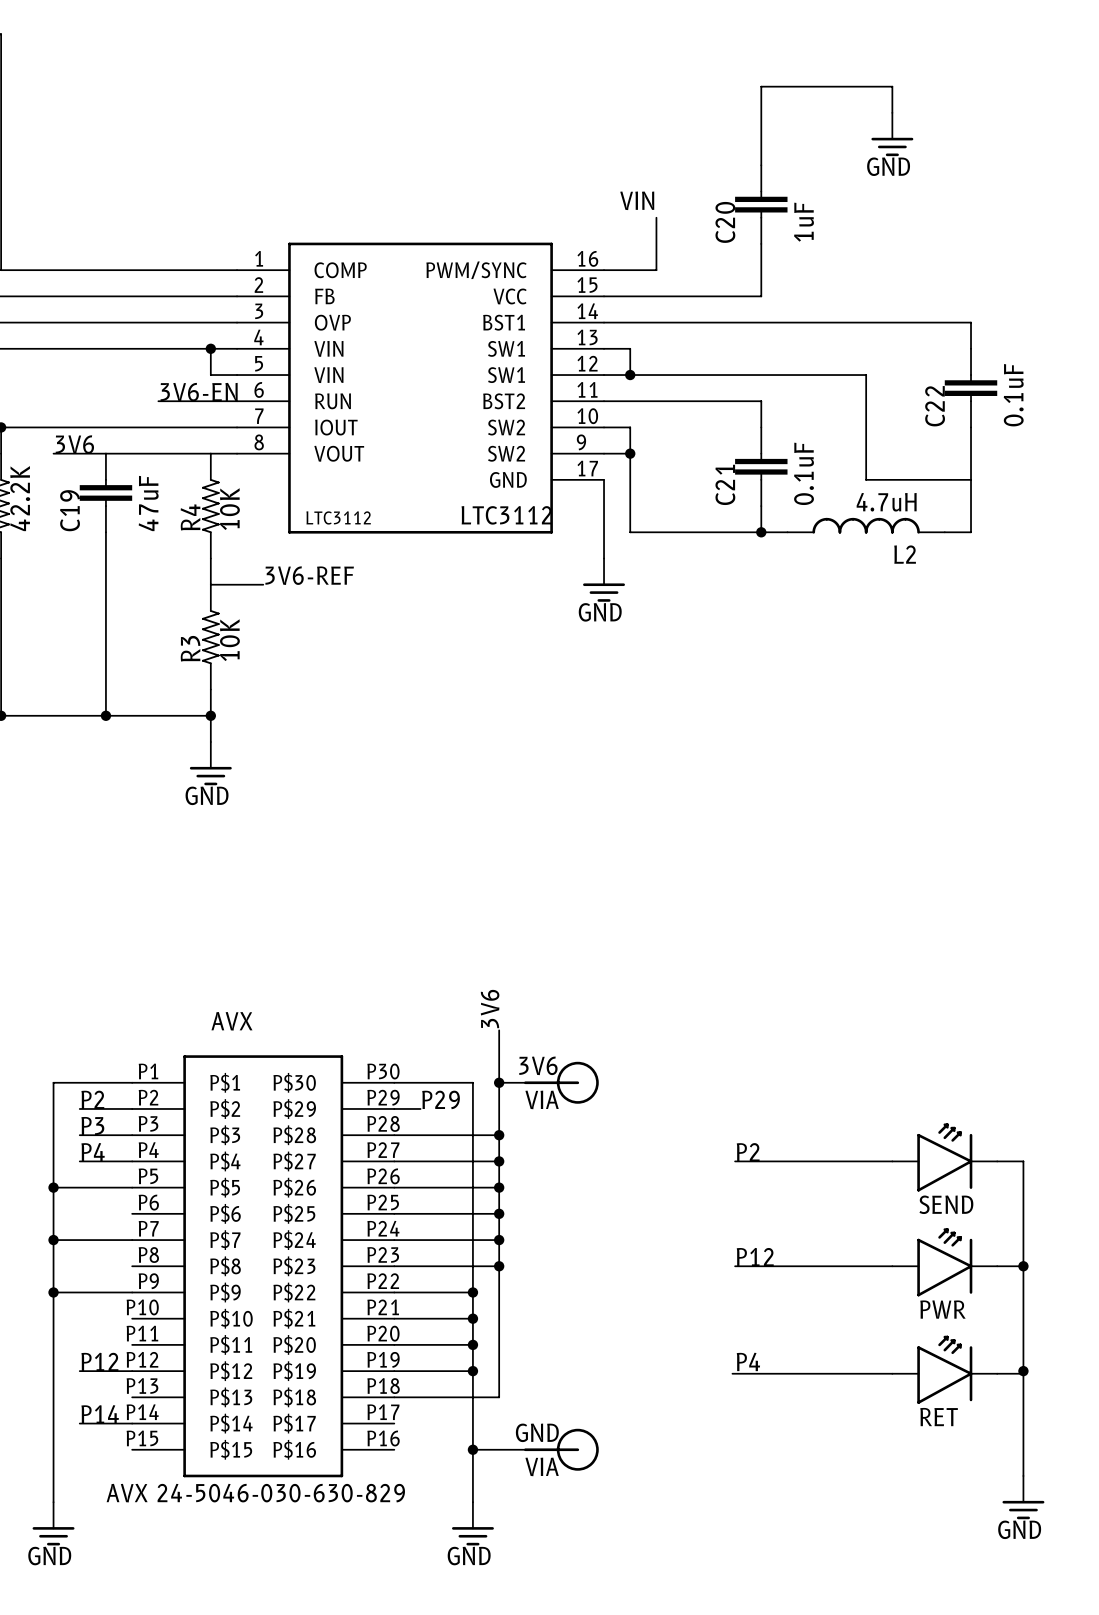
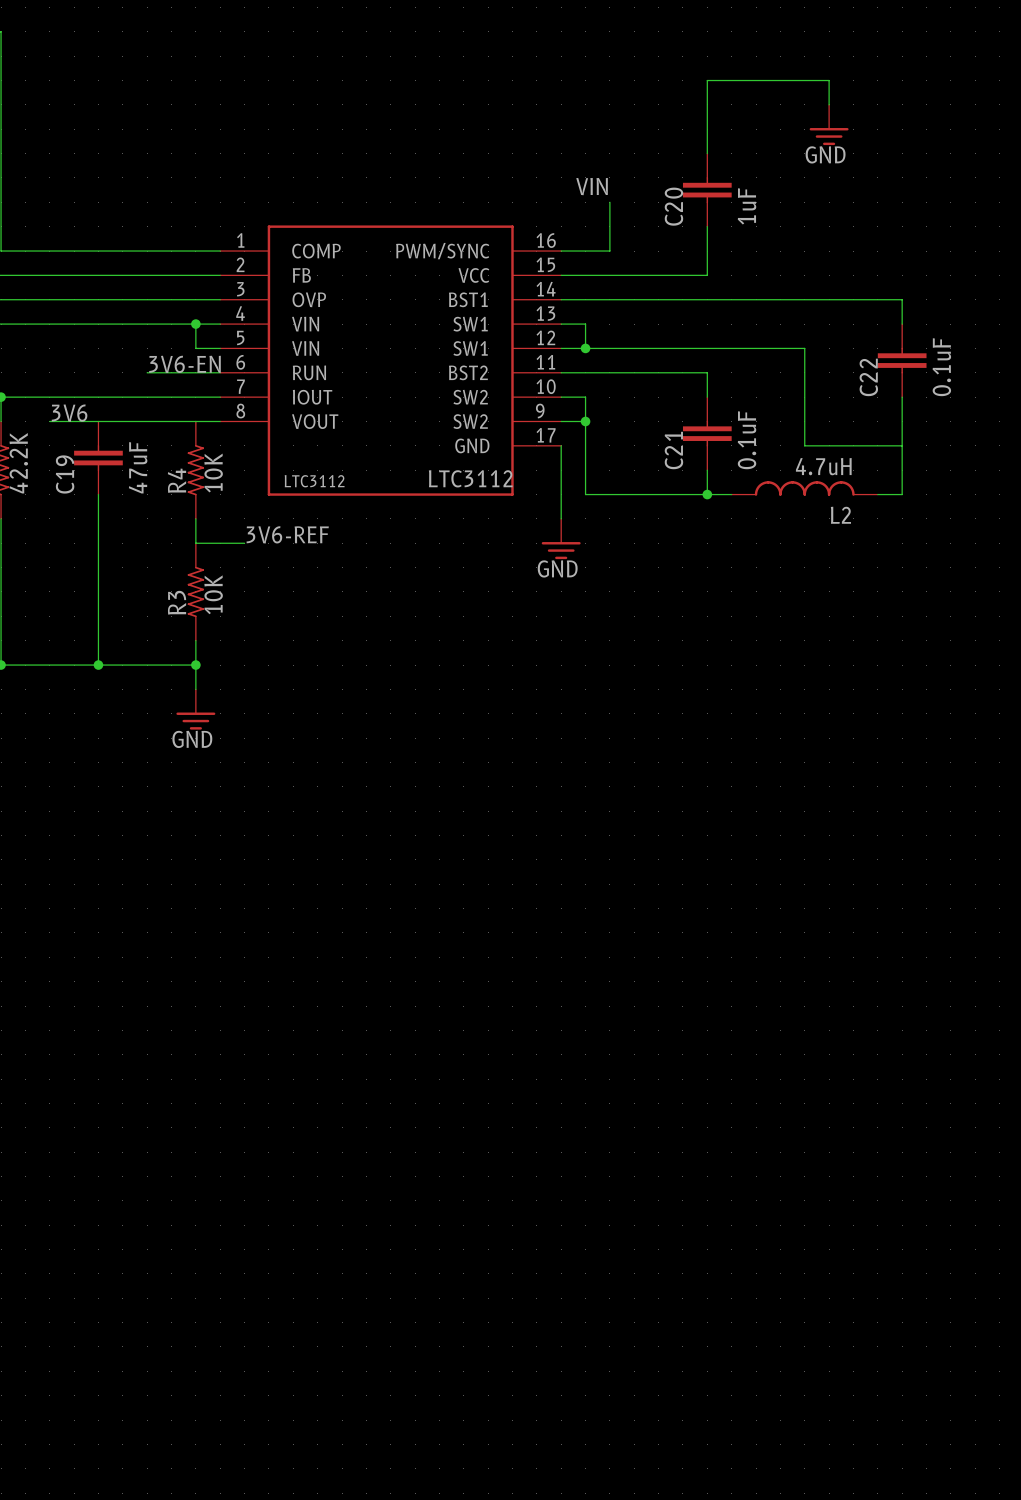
label: 3V6 (490, 1009) -> none
wire: (499, 1030) (499, 1397) (394, 1397) -> none
wire: (132, 1082) (53, 1082) (53, 1502) -> none
wire: (394, 1082) (472, 1082) (472, 1502) -> none
wire: (499, 1082) (525, 1082) -> none
junction: (499, 1082) -> none
part: 3V6 (561, 1082) -> none
label: P2 (92, 1099) -> none
label: P29 (441, 1099) -> none
wire: (79, 1108) (132, 1108) -> none
wire: (394, 1108) (420, 1108) -> none
label: P3 (92, 1126) -> none
wire: (79, 1135) (132, 1135) -> none
wire: (394, 1135) (499, 1135) -> none
junction: (499, 1135) -> none
label: P4 (93, 1152) -> none
label: P2 (748, 1152) -> none
SEND: (944, 1157) -> none
wire: (79, 1161) (132, 1161) -> none
wire: (394, 1161) (499, 1161) -> none
junction: (499, 1161) -> none
wire: (735, 1161) (892, 1161) -> none
wire: (997, 1161) (1023, 1161) (1023, 1475) -> none
wire: (53, 1187) (132, 1187) -> none
junction: (53, 1187) -> none
wire: (394, 1187) (499, 1187) -> none
junction: (499, 1187) -> none
wire: (394, 1213) (499, 1213) -> none
junction: (499, 1213) -> none
wire: (53, 1240) (132, 1240) -> none
junction: (53, 1240) -> none
wire: (394, 1240) (499, 1240) -> none
junction: (499, 1240) -> none
label: P12 (755, 1257) -> none
PWR: (944, 1262) -> none
AVX: (263, 1266) -> none
wire: (394, 1266) (499, 1266) -> none
junction: (499, 1266) -> none
wire: (735, 1266) (892, 1266) -> none
wire: (997, 1266) (1023, 1266) -> none
junction: (1023, 1266) -> none
wire: (53, 1292) (132, 1292) -> none
junction: (53, 1292) -> none
wire: (394, 1292) (472, 1292) -> none
junction: (472, 1292) -> none
wire: (394, 1318) (472, 1318) -> none
junction: (472, 1318) -> none
wire: (394, 1344) (472, 1344) -> none
junction: (472, 1344) -> none
label: P12 (99, 1361) -> none
label: P4 (748, 1361) -> none
RET: (944, 1369) -> none
wire: (79, 1371) (132, 1371) -> none
wire: (394, 1371) (472, 1371) -> none
junction: (472, 1371) -> none
junction: (1023, 1371) -> none
wire: (732, 1373) (892, 1373) -> none
wire: (997, 1373) (1023, 1373) -> none
label: P14 (100, 1414) -> none
wire: (79, 1423) (132, 1423) -> none
wire: (472, 1449) (525, 1449) -> none
junction: (472, 1449) -> none
part: GND (561, 1449) -> none
power symbol: GND (1023, 1497) -> none
power symbol: GND (53, 1523) -> none
power symbol: GND (472, 1523) -> none

